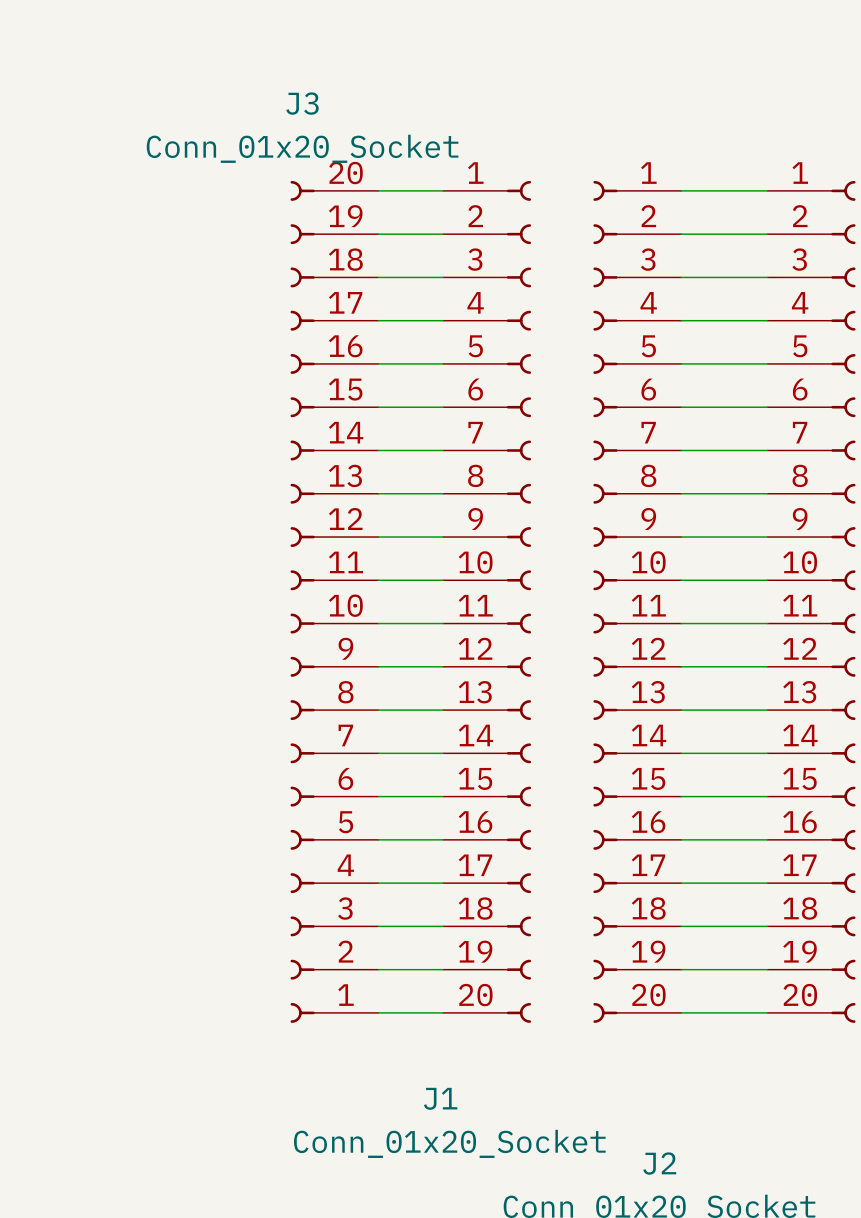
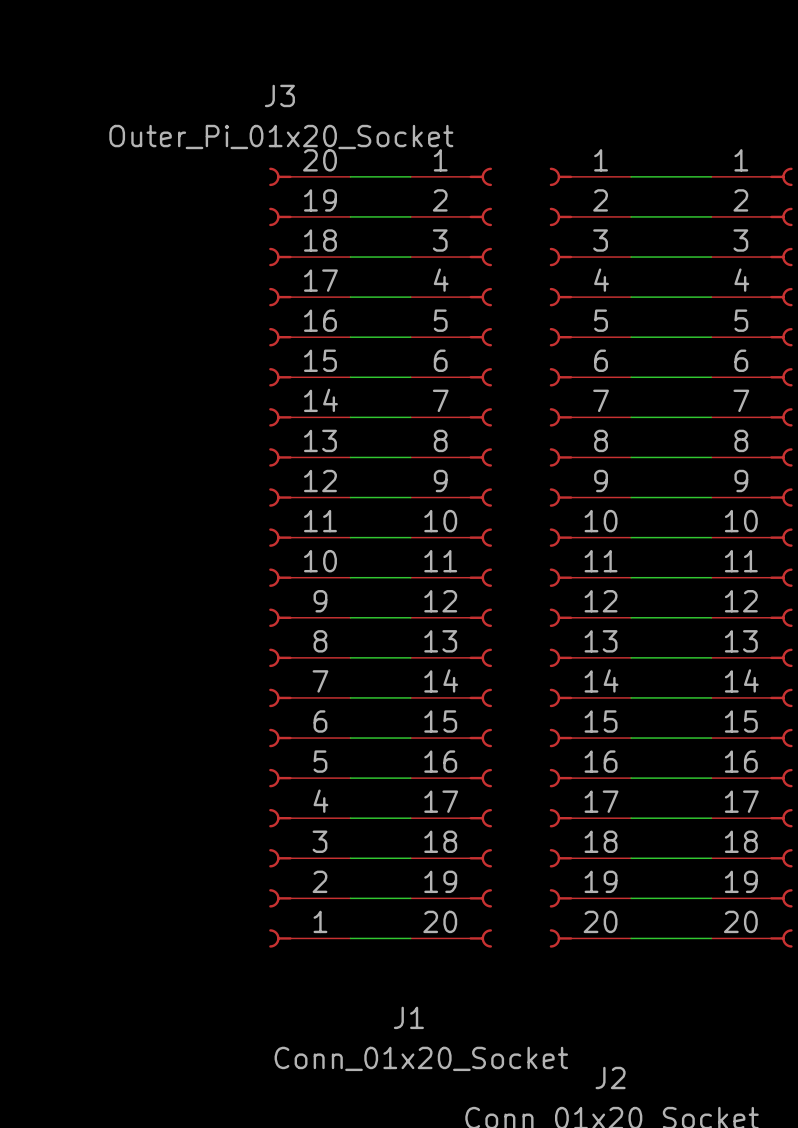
J3 value: Conn_01x20_Socket (302, 148) -> Outer_Pi_01x20_Socket (281, 136)

